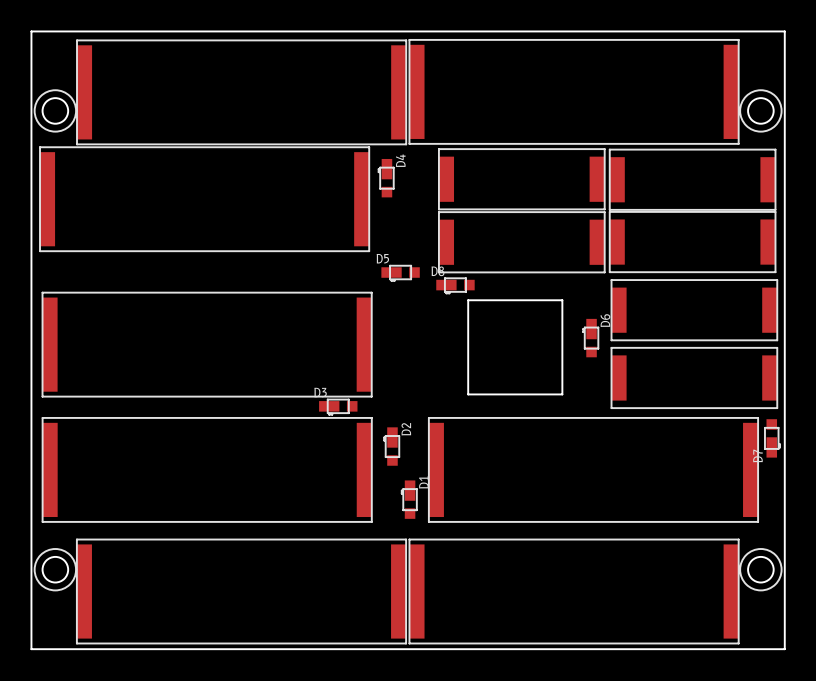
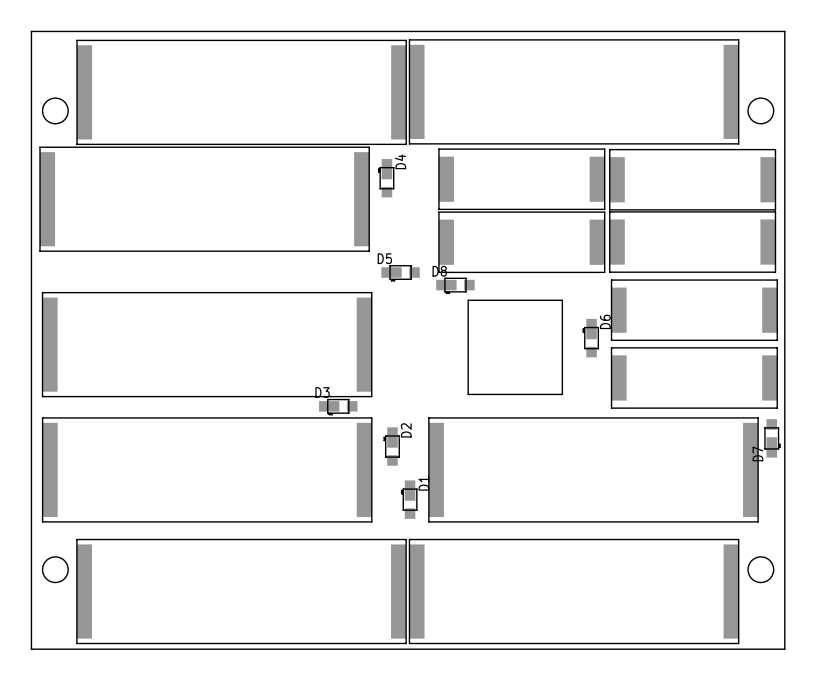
drawing: [34, 89, 77, 133] -> none
drawing: [739, 89, 783, 133] -> none
drawing: [34, 548, 77, 592] -> none
drawing: [739, 548, 783, 592] -> none

